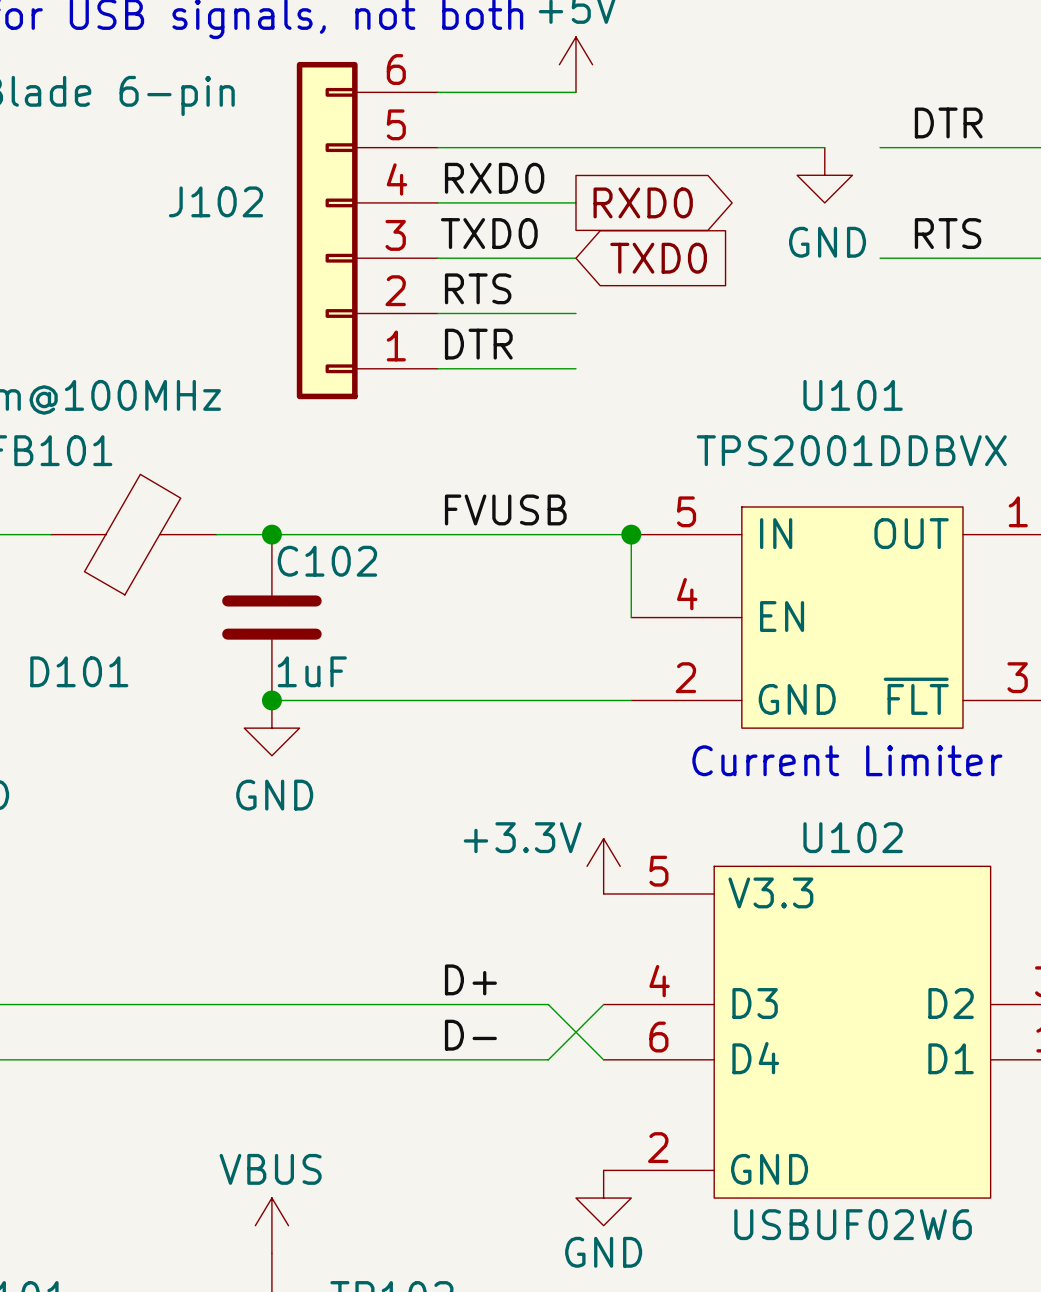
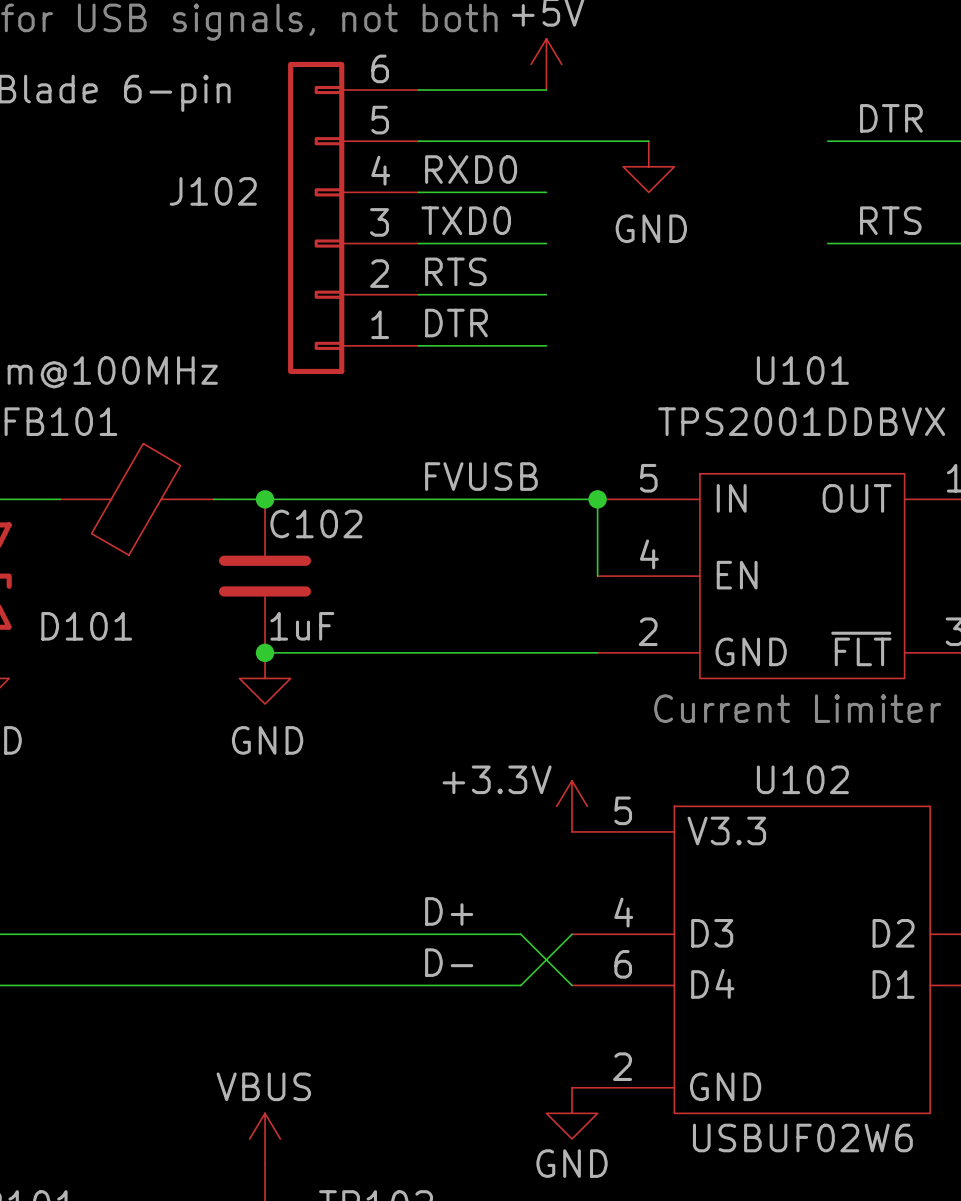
wire: (686, 147) (824, 147) -> none
power symbol position: GND (824, 175) -> GND (648, 166)
global label: RXD0 (643, 202) -> none
global label: TXD0 (658, 258) -> none

